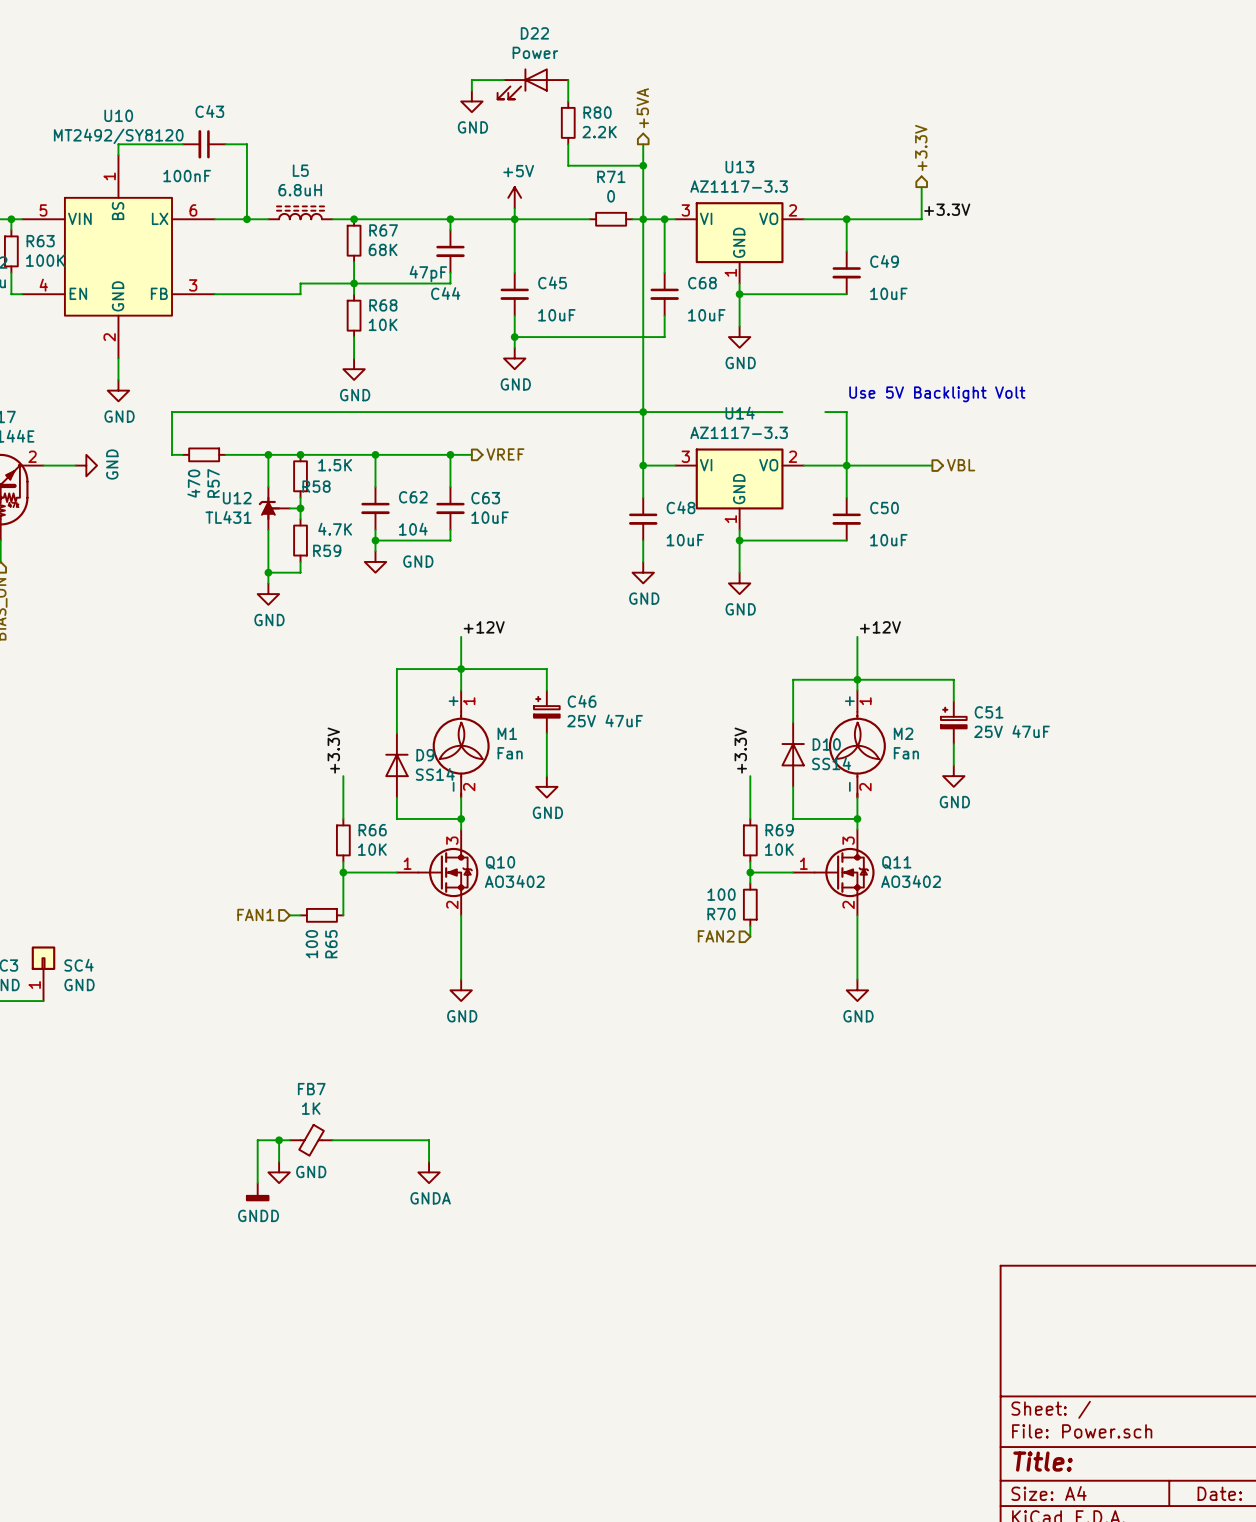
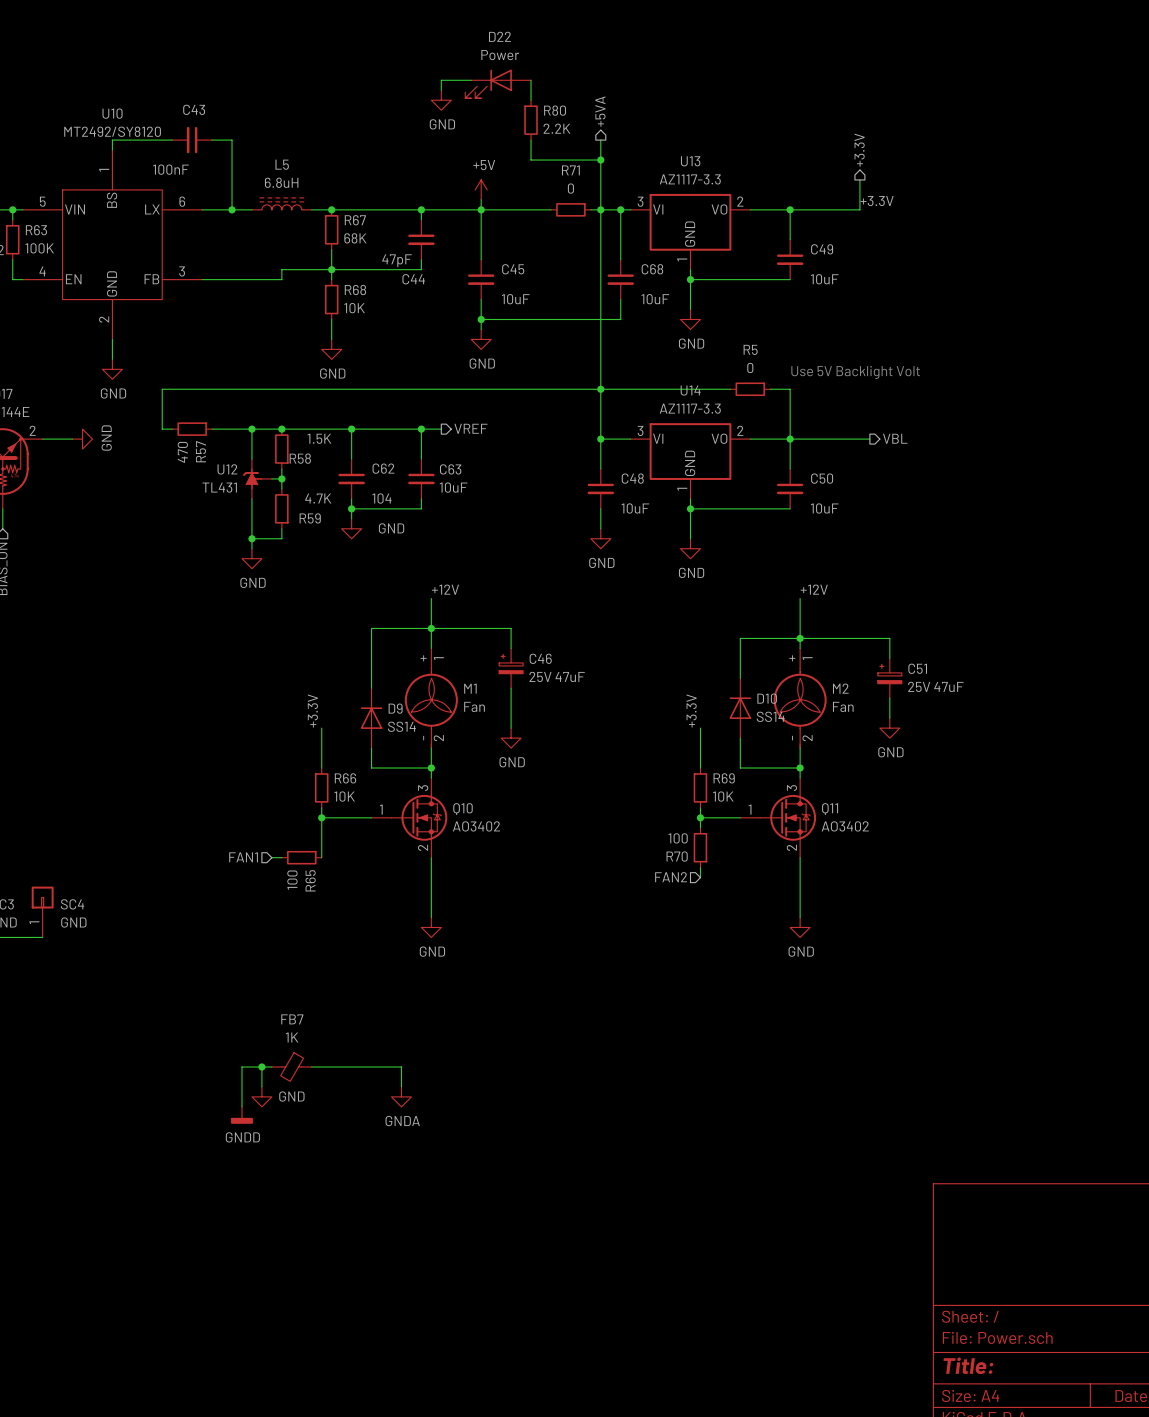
R5: none -> 0 (750, 389)

